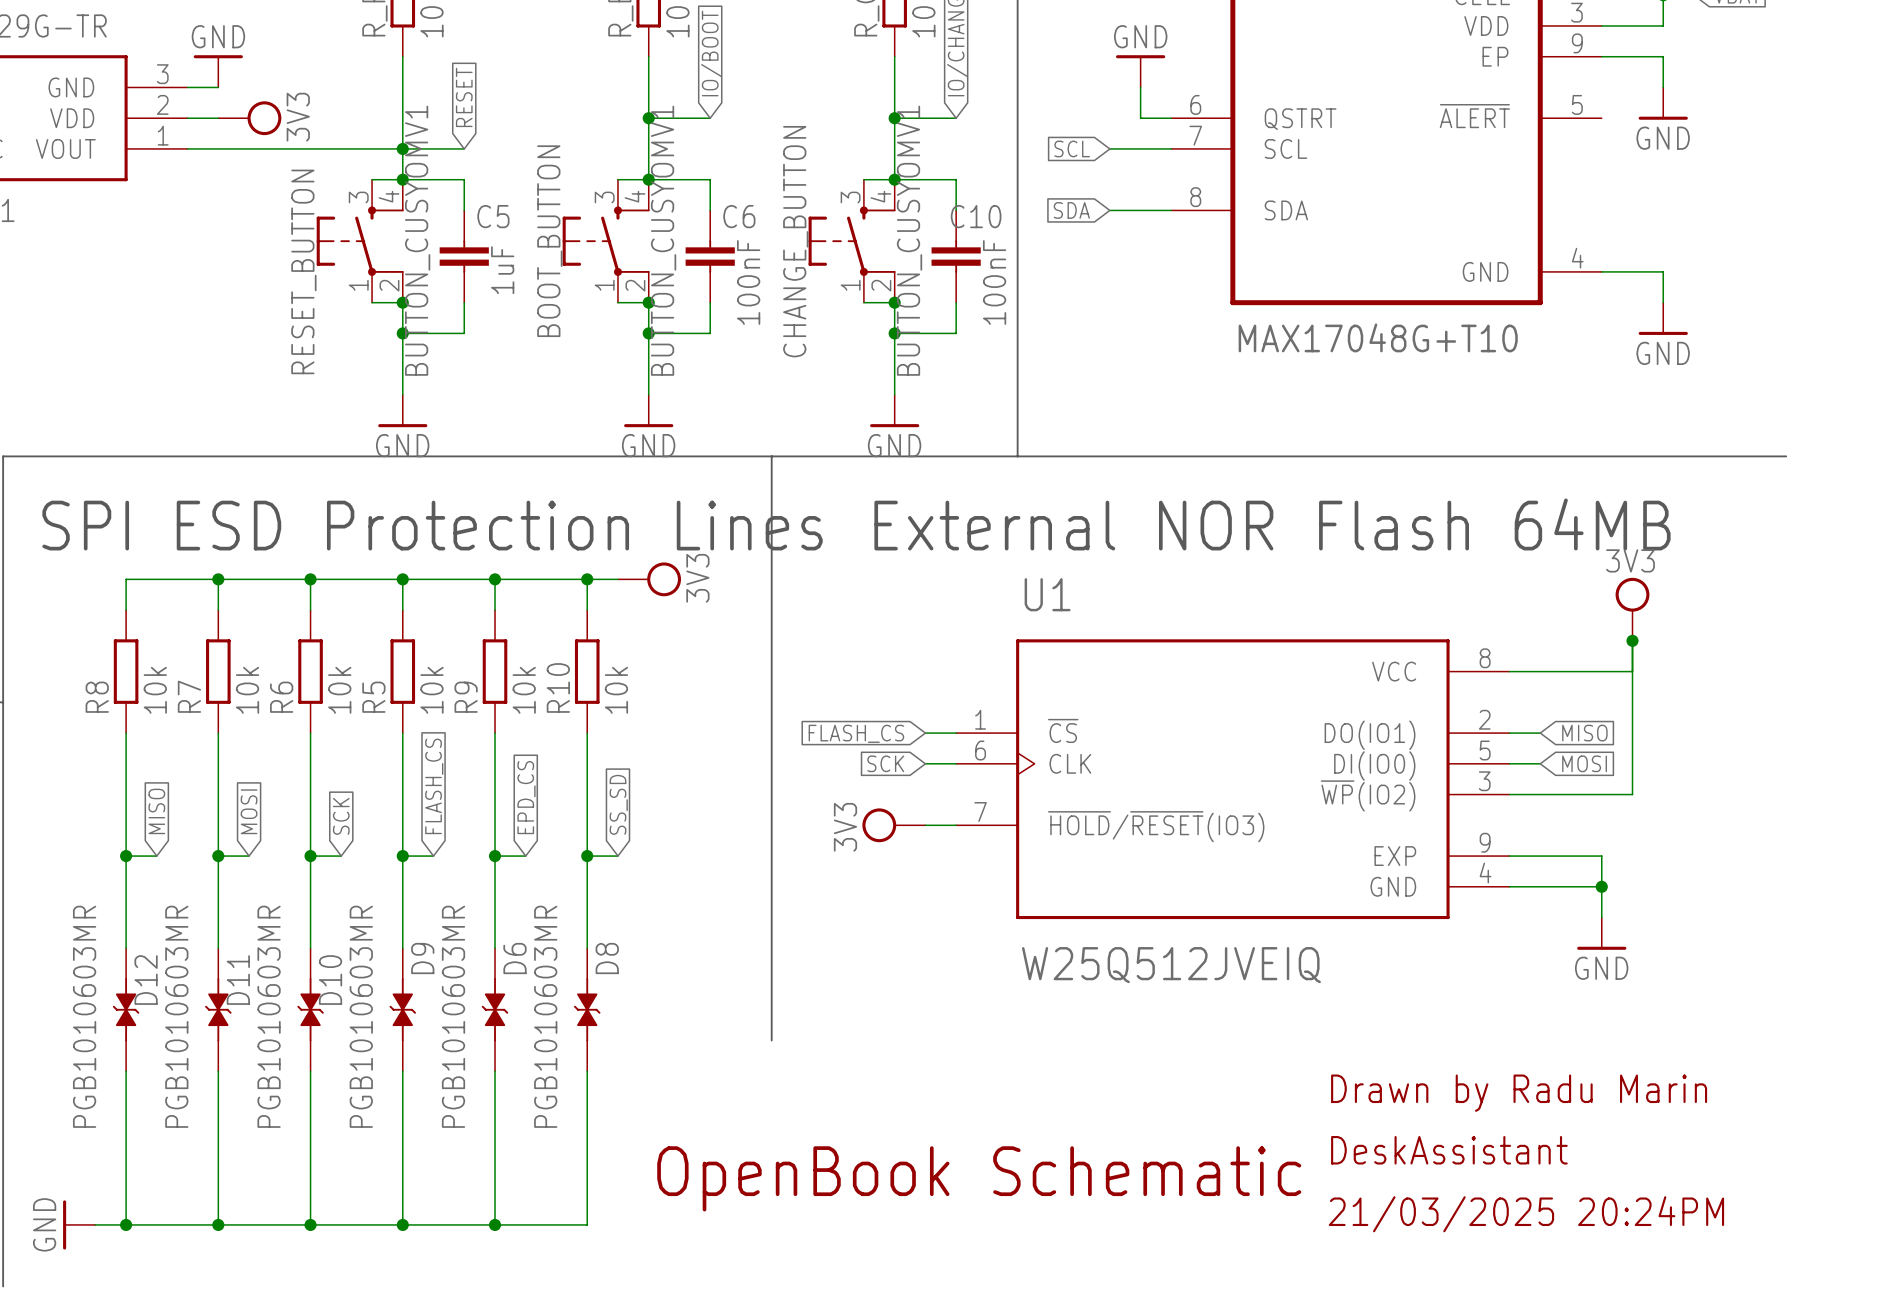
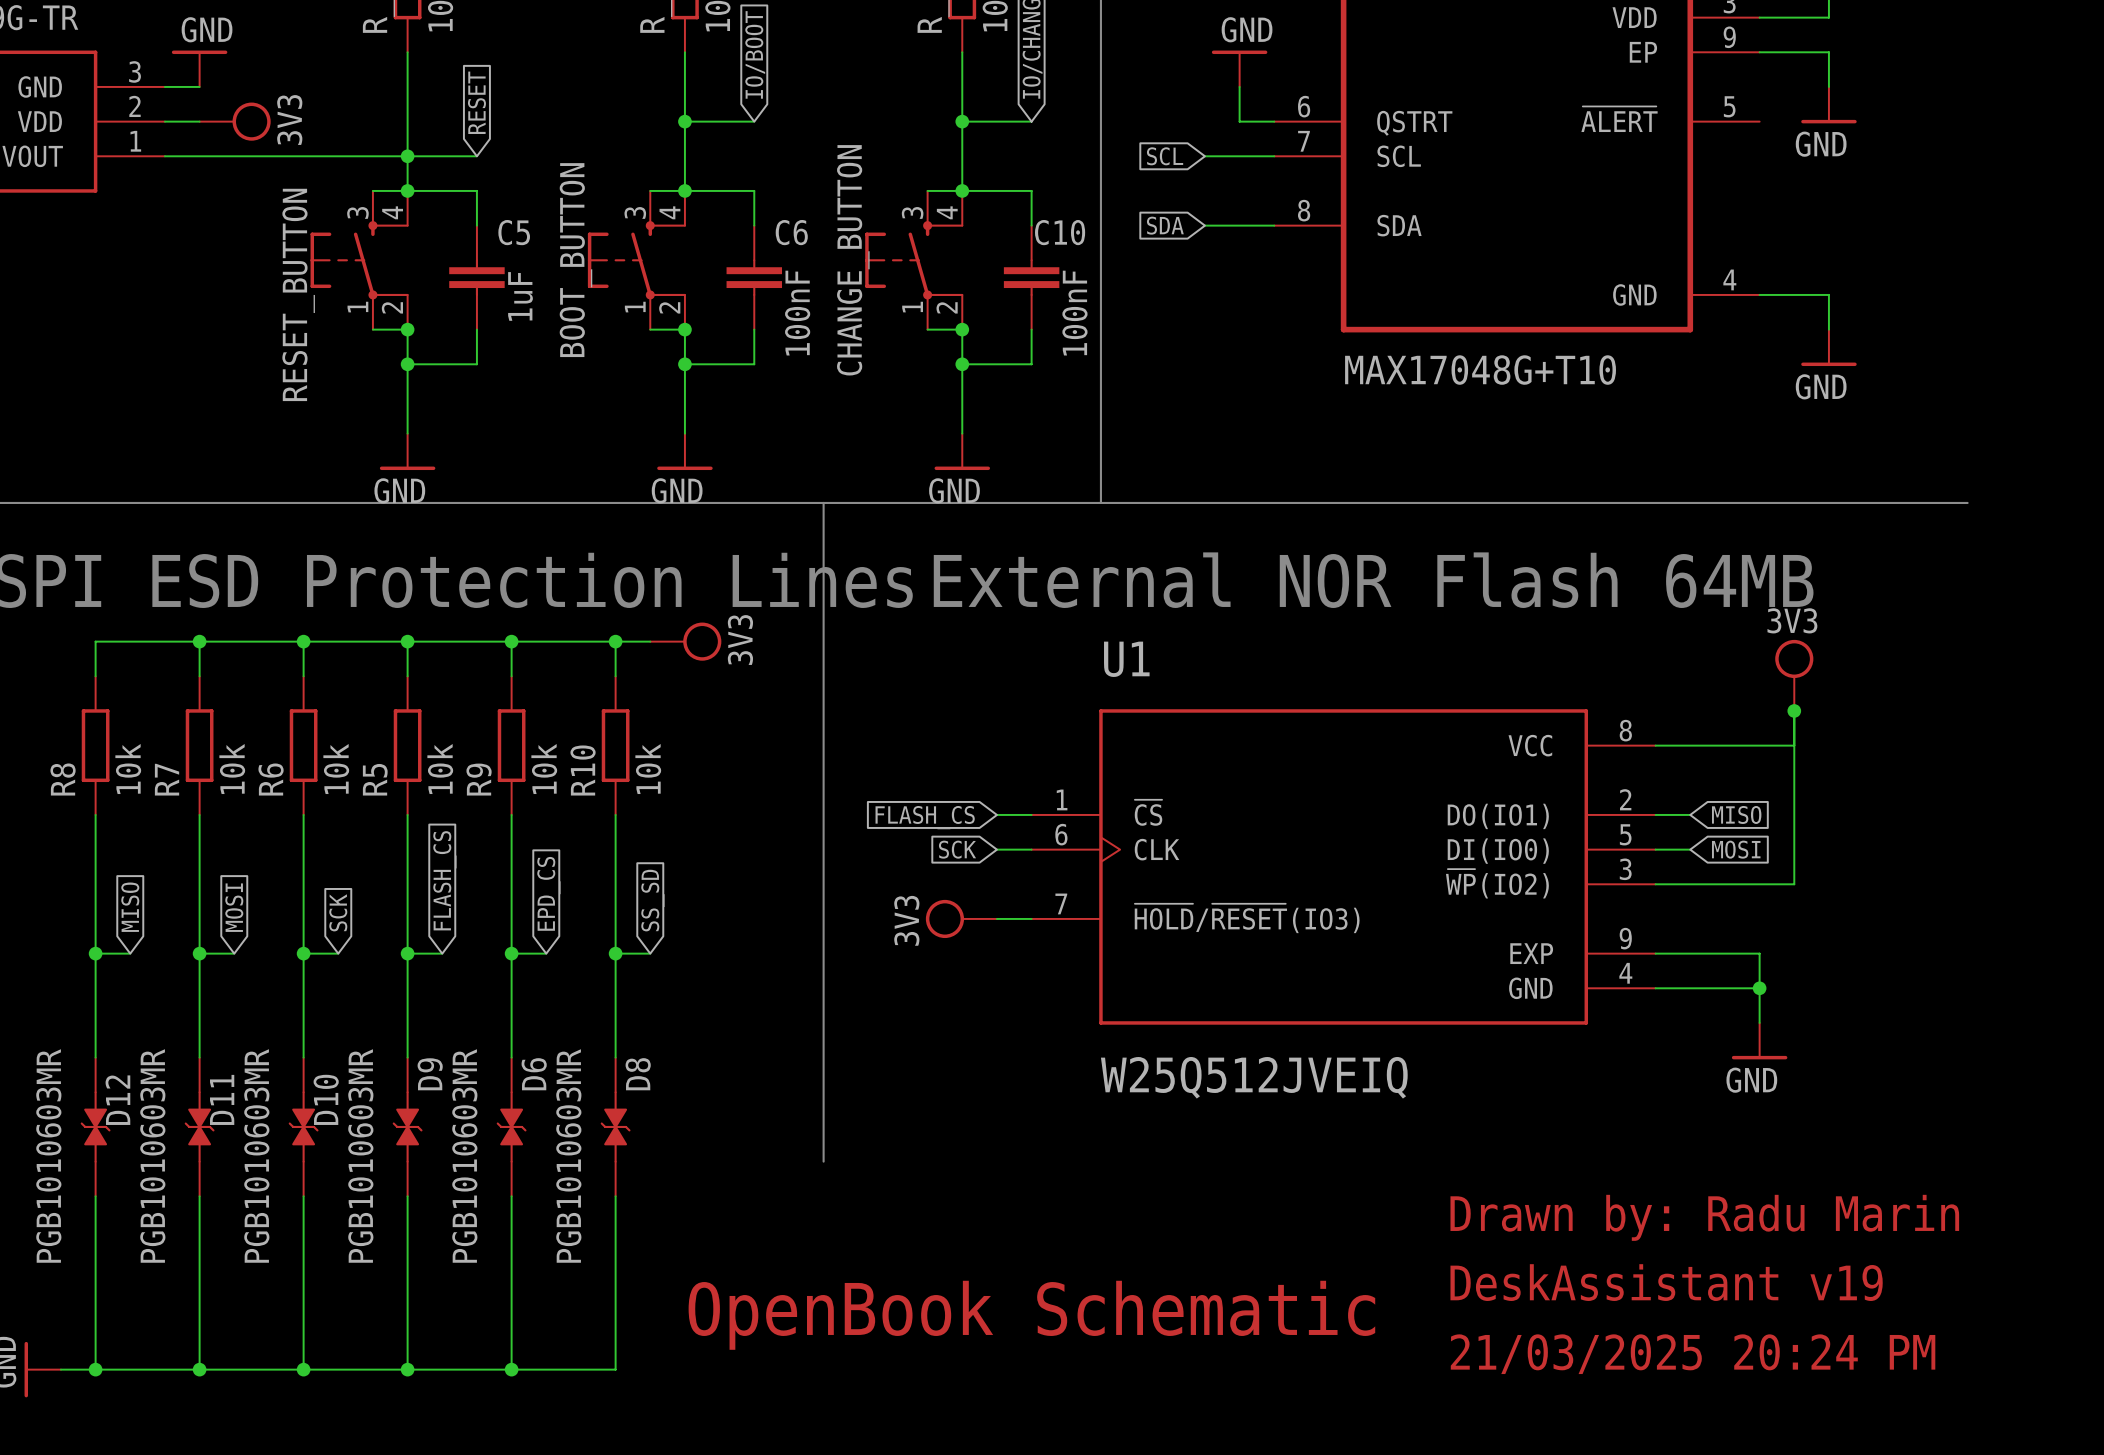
RESET_BUTTON value: BUTTON_CUSYOMV1 (417, 240) -> none
BOOT_BUTTON value: BUTTON_CUSYOMV1 (663, 240) -> none
CHANGE_BUTTON value: BUTTON_CUSYOMV1 (909, 240) -> none
text: Drawn by Radu Marin (1519, 1093) -> Drawn by: Radu Marin (1704, 1217)
text: DeskAssistant (1449, 1150) -> DeskAssistant v19 (1666, 1282)
text: 21/03/2025 20:24PM (1526, 1214) -> 21/03/2025 20:24 PM (1693, 1354)

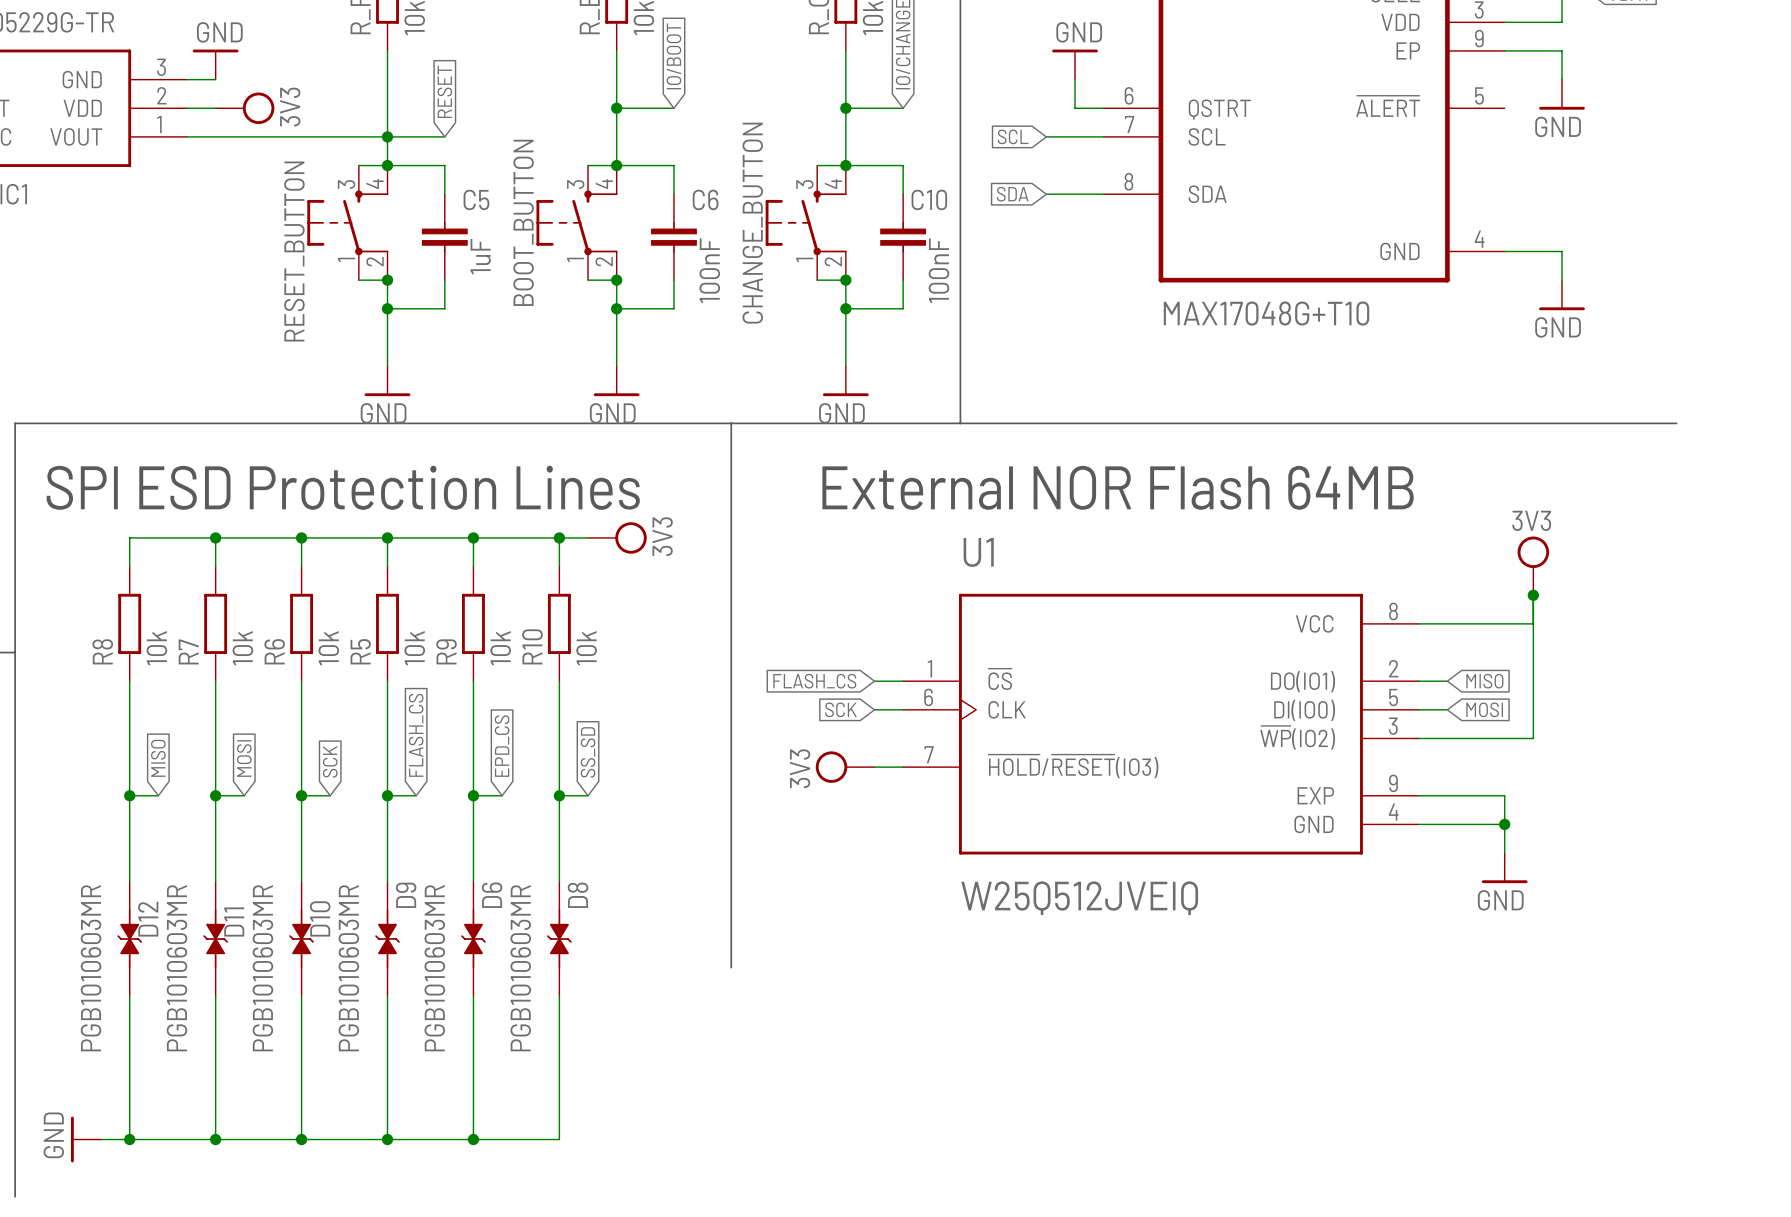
text: Drawn by: Radu Marin (1704, 1217) -> none
text: DeskAssistant v19 (1666, 1282) -> none
text: OpenBook Schematic (1031, 1315) -> none
text: 21/03/2025 20:24 PM (1693, 1354) -> none

